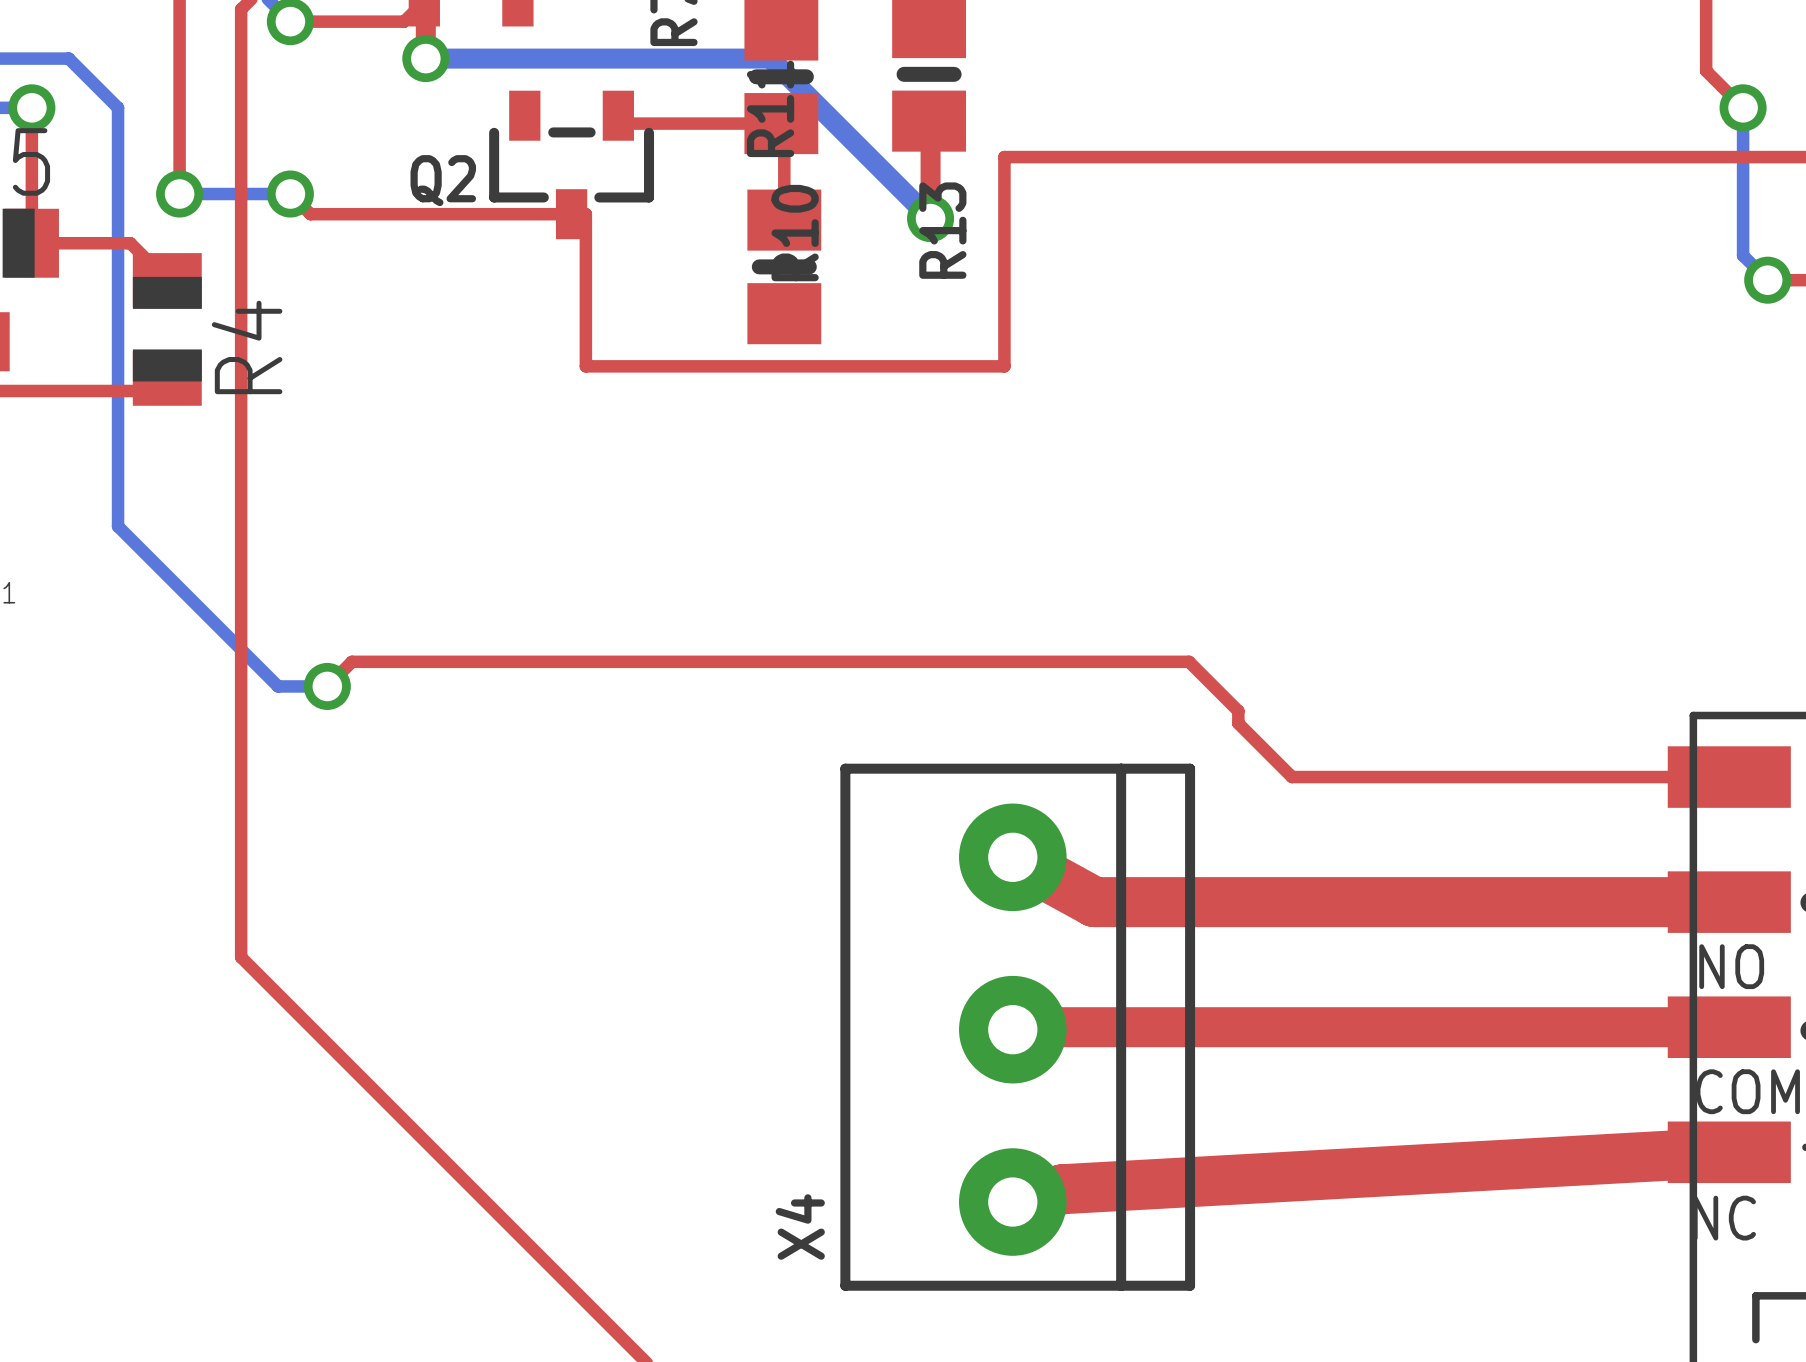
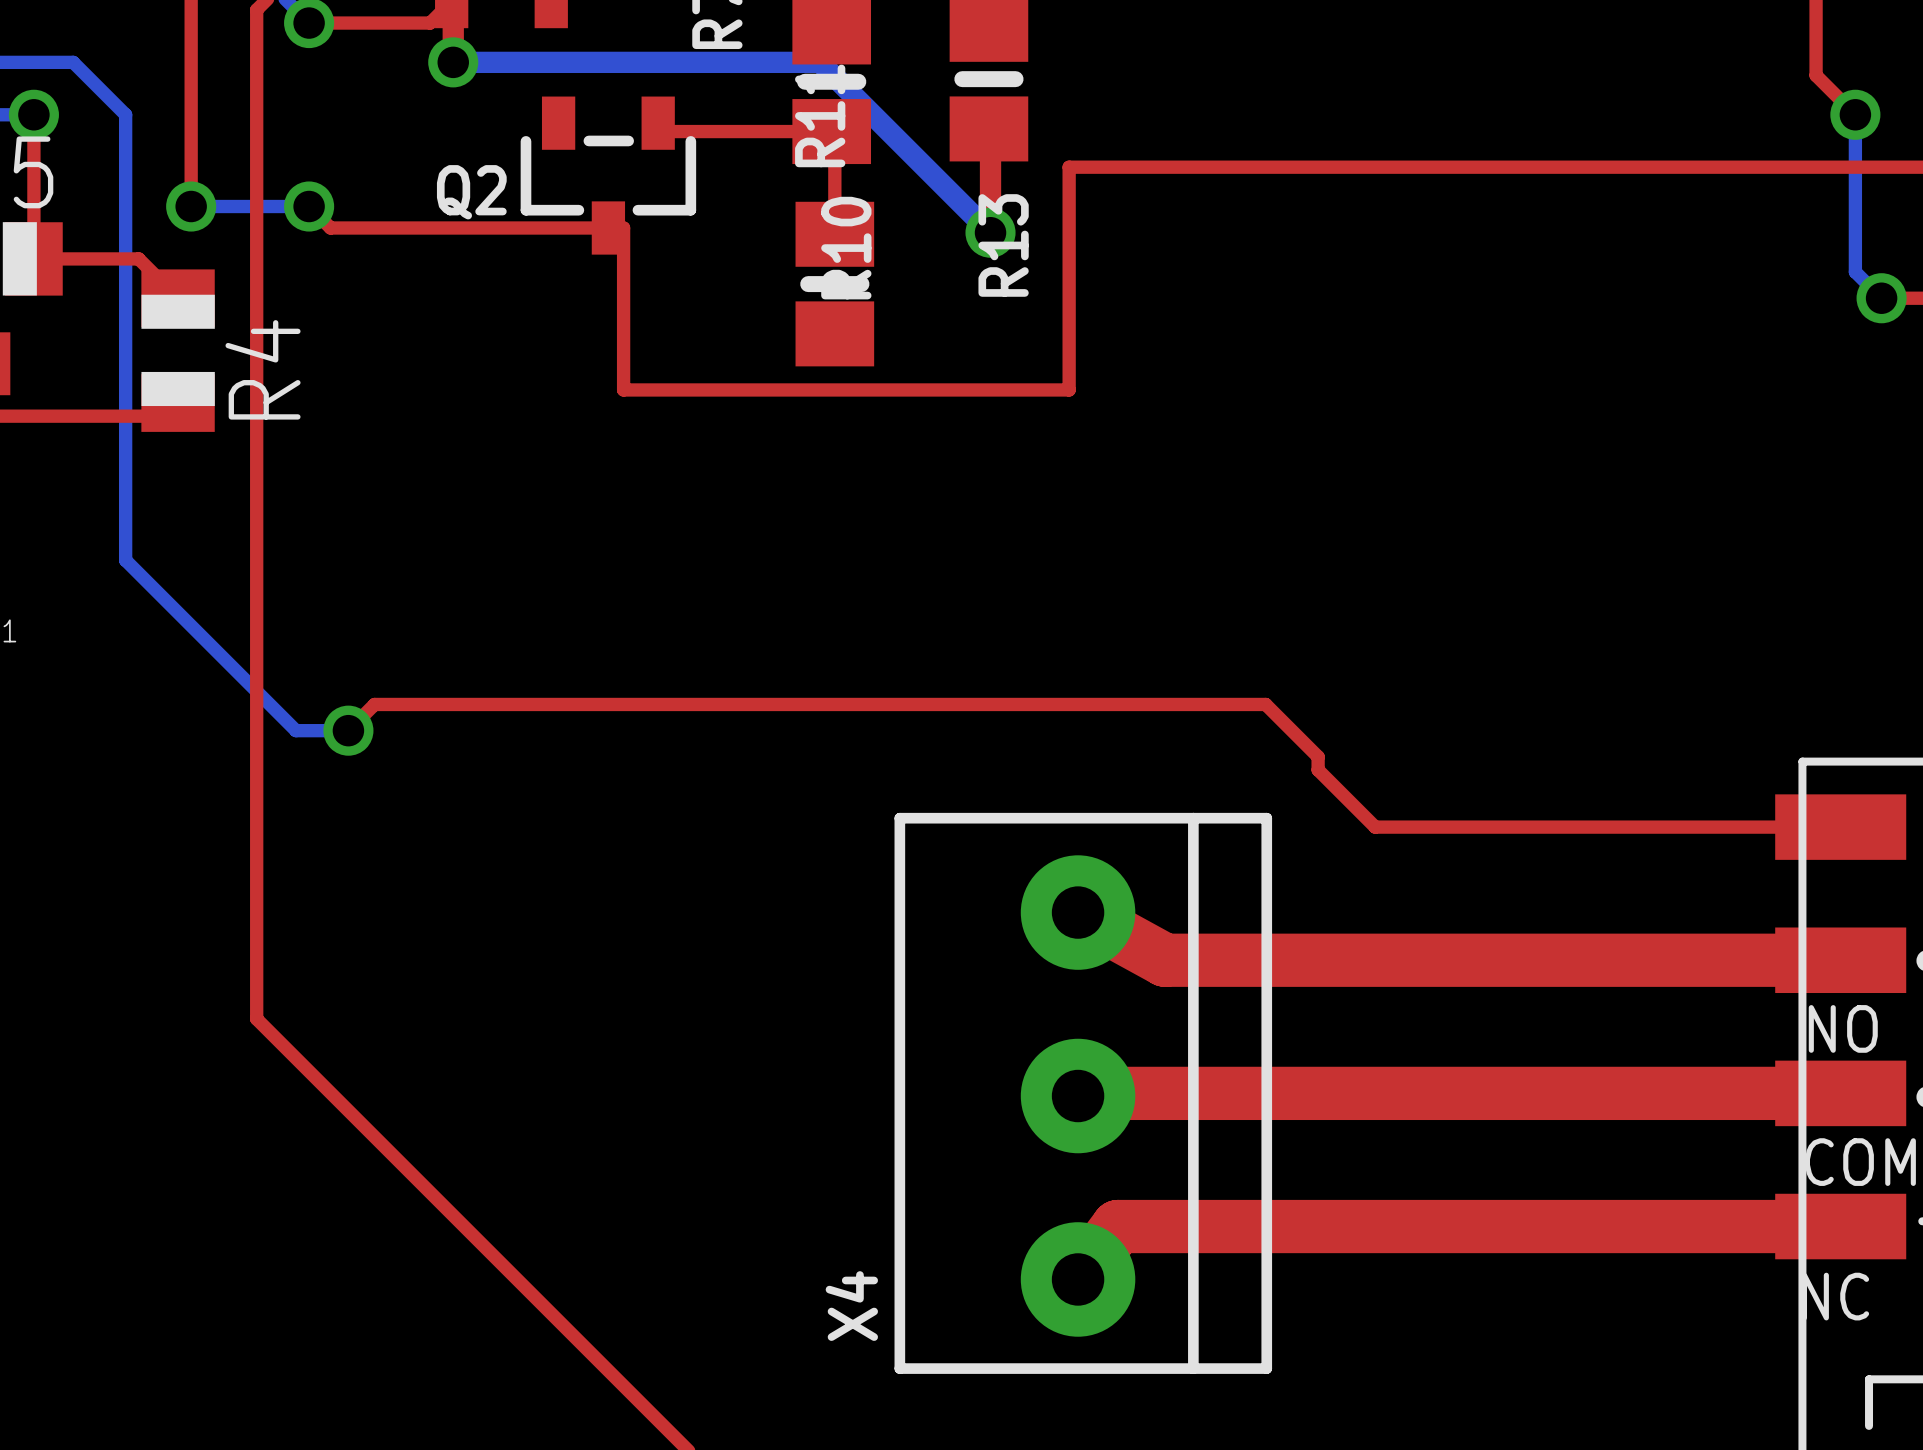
top track width: thin (1047, 1027) (1729, 1027) -> thick (1114, 1093) (1840, 1093)
top track: (1729, 1152) (1062, 1189) (1012, 1202) -> (1840, 1226) (1117, 1226) (1078, 1279)

